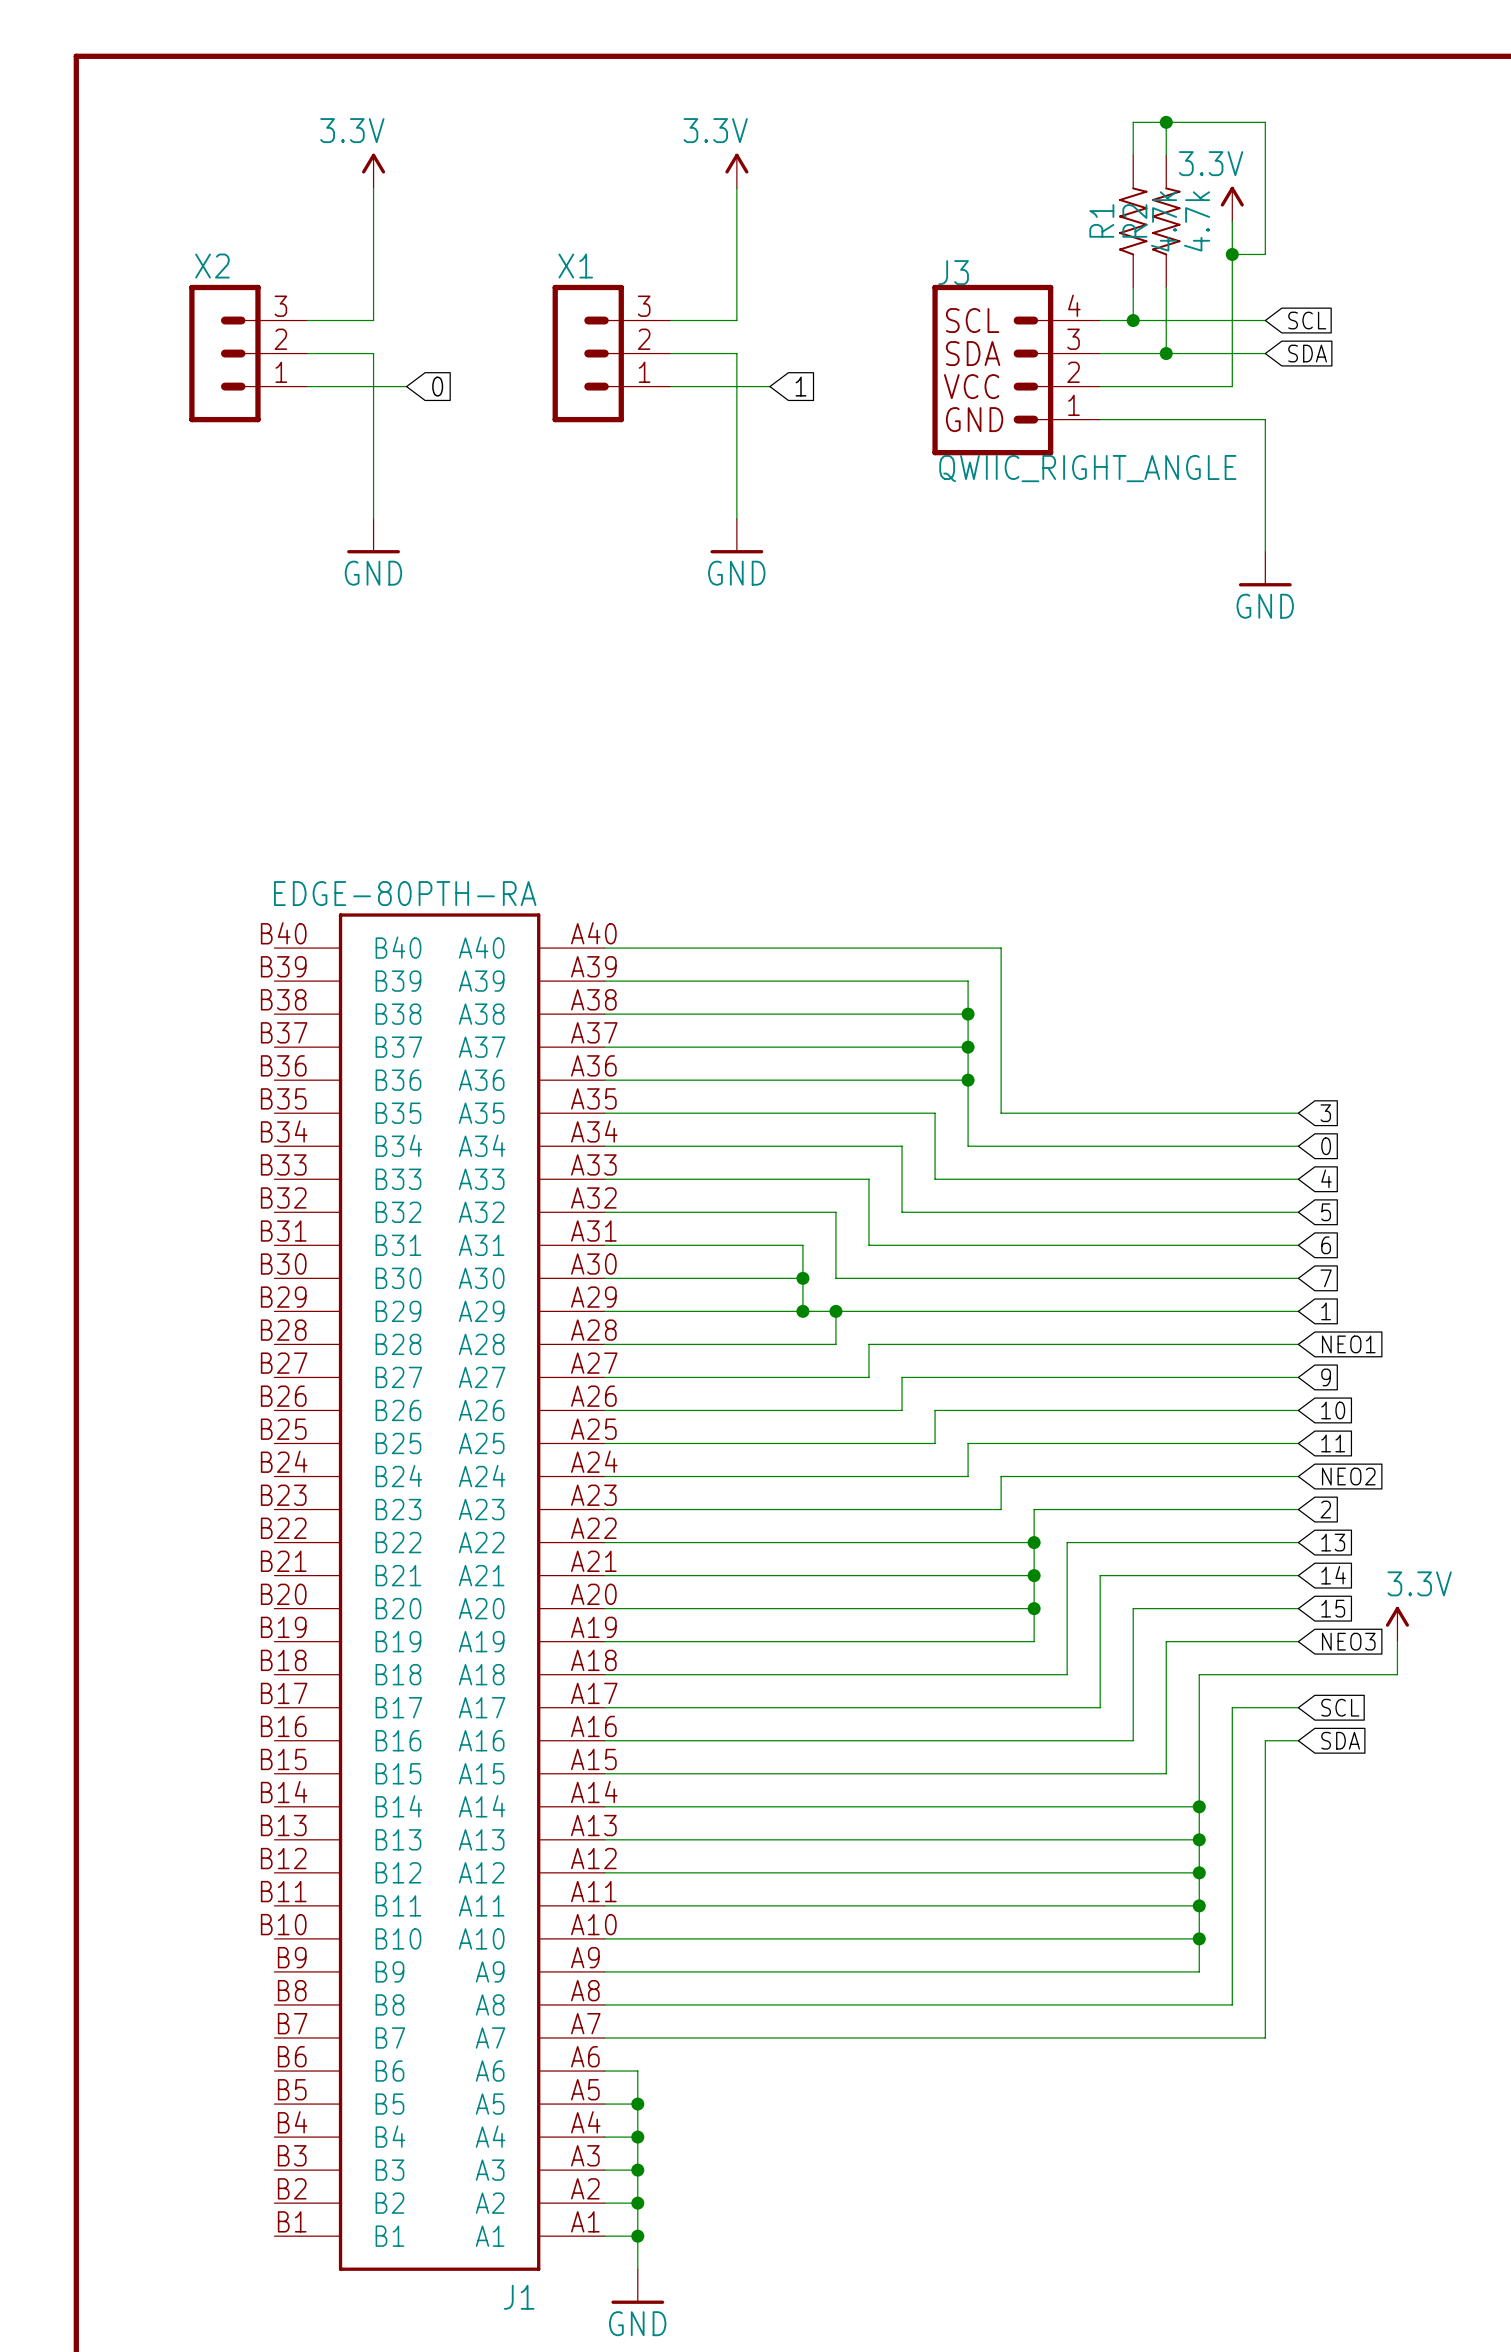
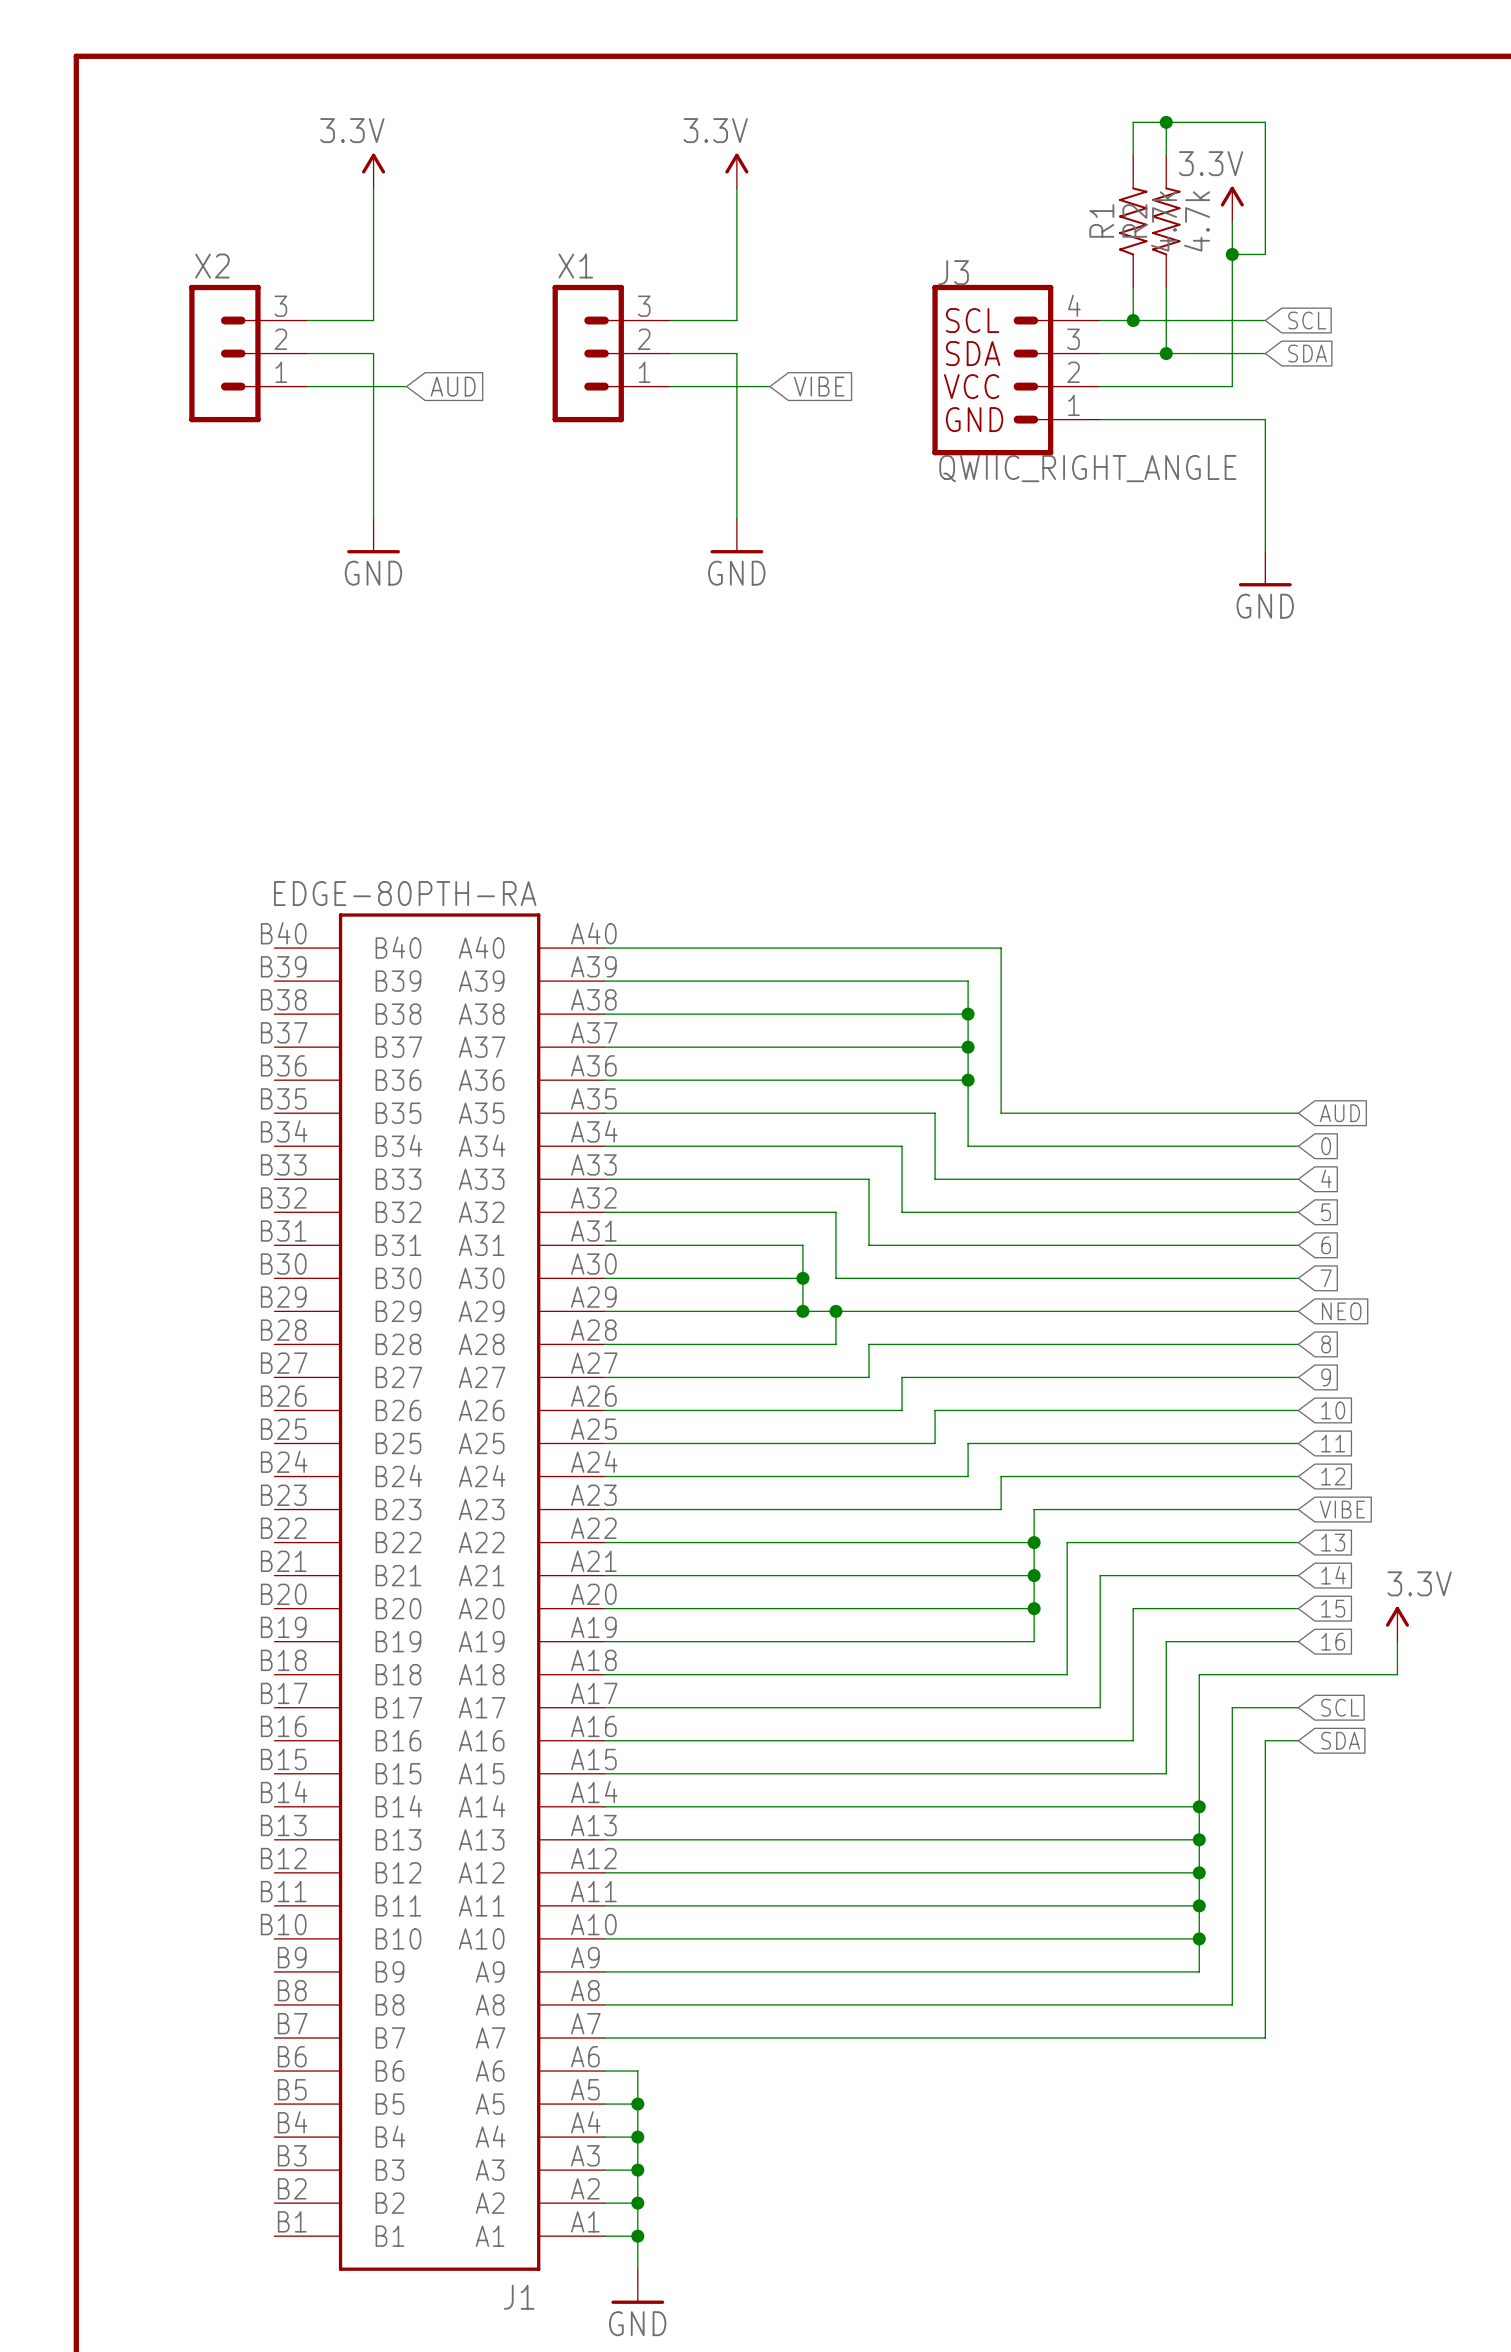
global label: 0 (437, 386) -> AUD (453, 386)
global label: 1 (801, 386) -> VIBE (819, 386)
global label: 3 (1325, 1113) -> AUD (1339, 1113)
global label: 1 (1326, 1311) -> NEO (1341, 1311)
global label: NEO1 (1348, 1344) -> 8 (1326, 1344)
global label: NEO2 (1348, 1476) -> 12 (1333, 1476)
global label: 2 (1325, 1509) -> VIBE (1342, 1509)
global label: NEO3 (1348, 1641) -> 16 (1333, 1641)

